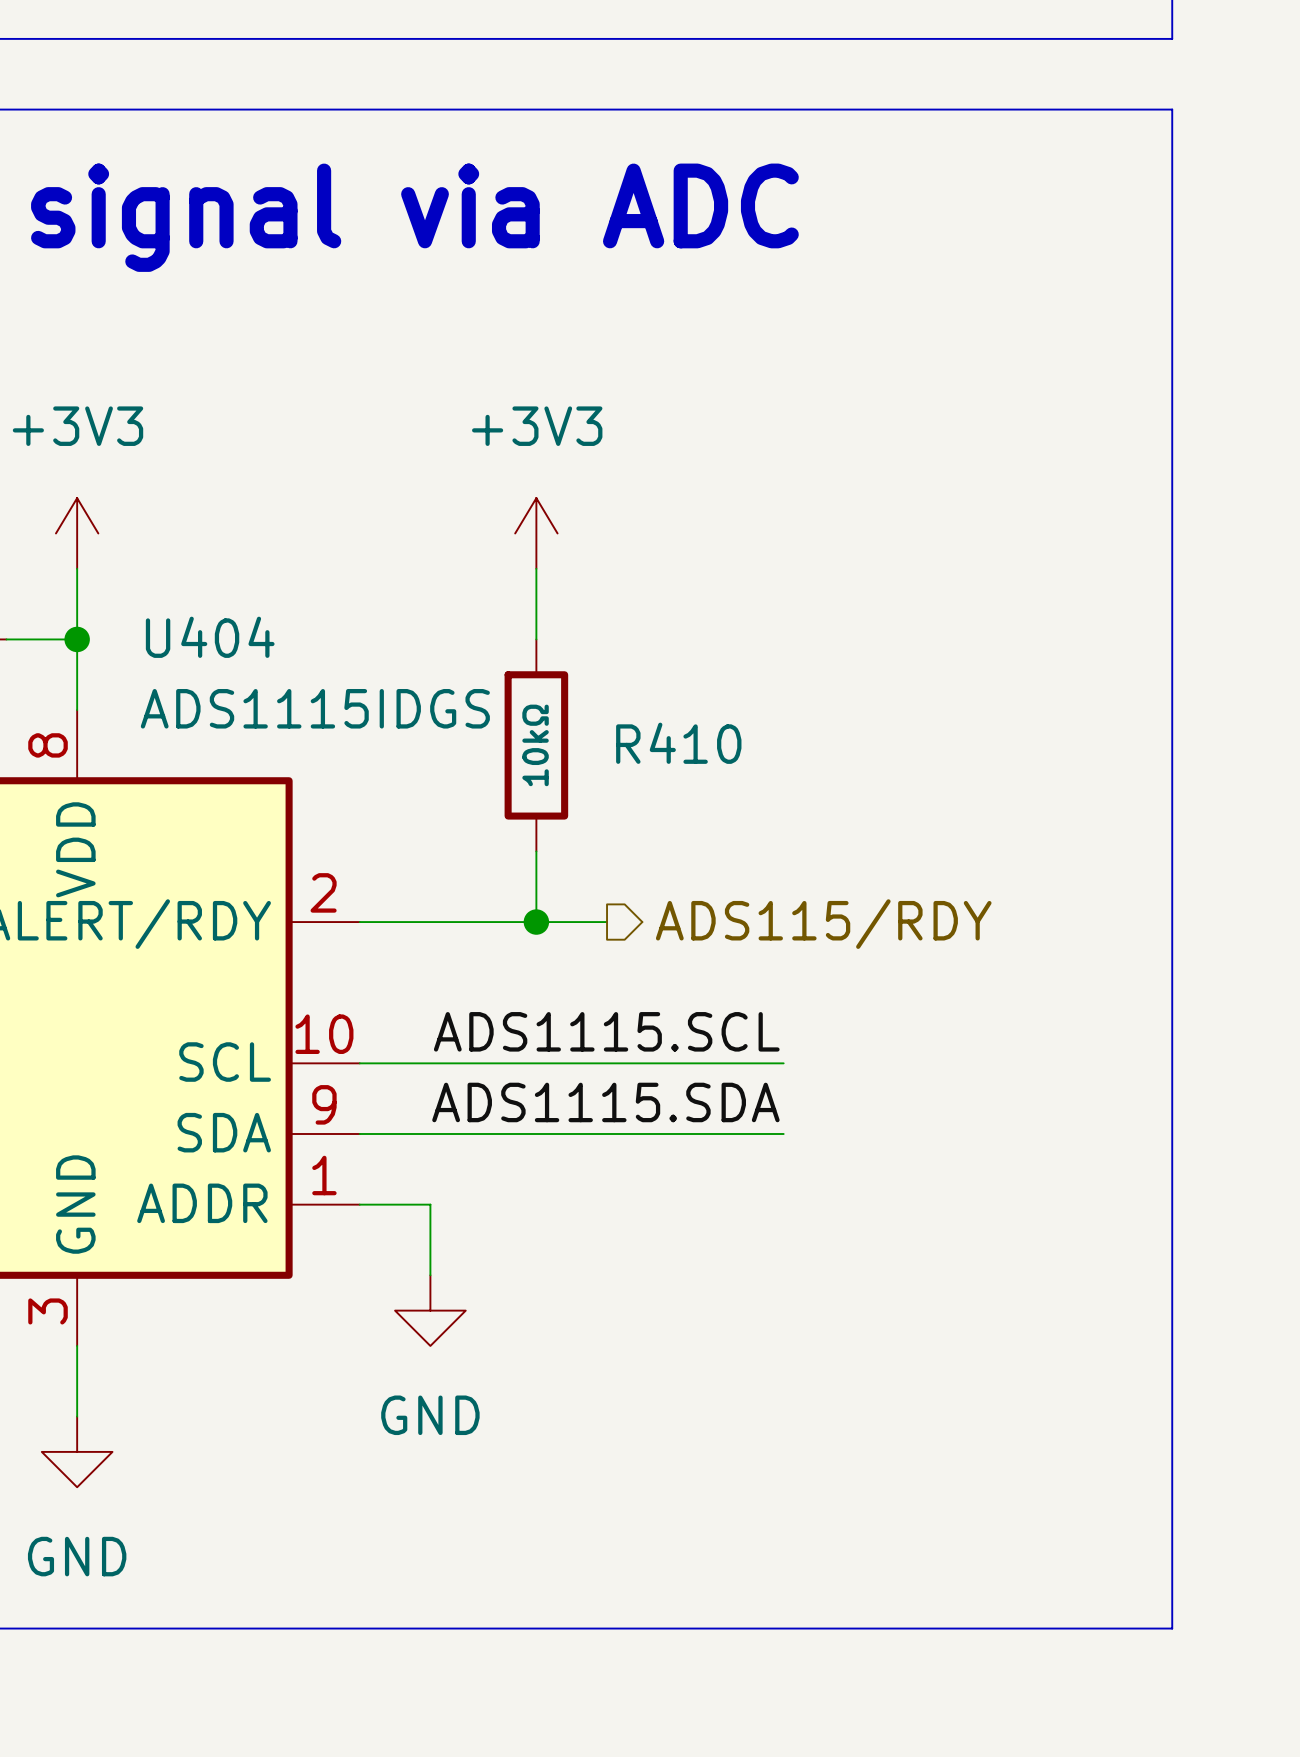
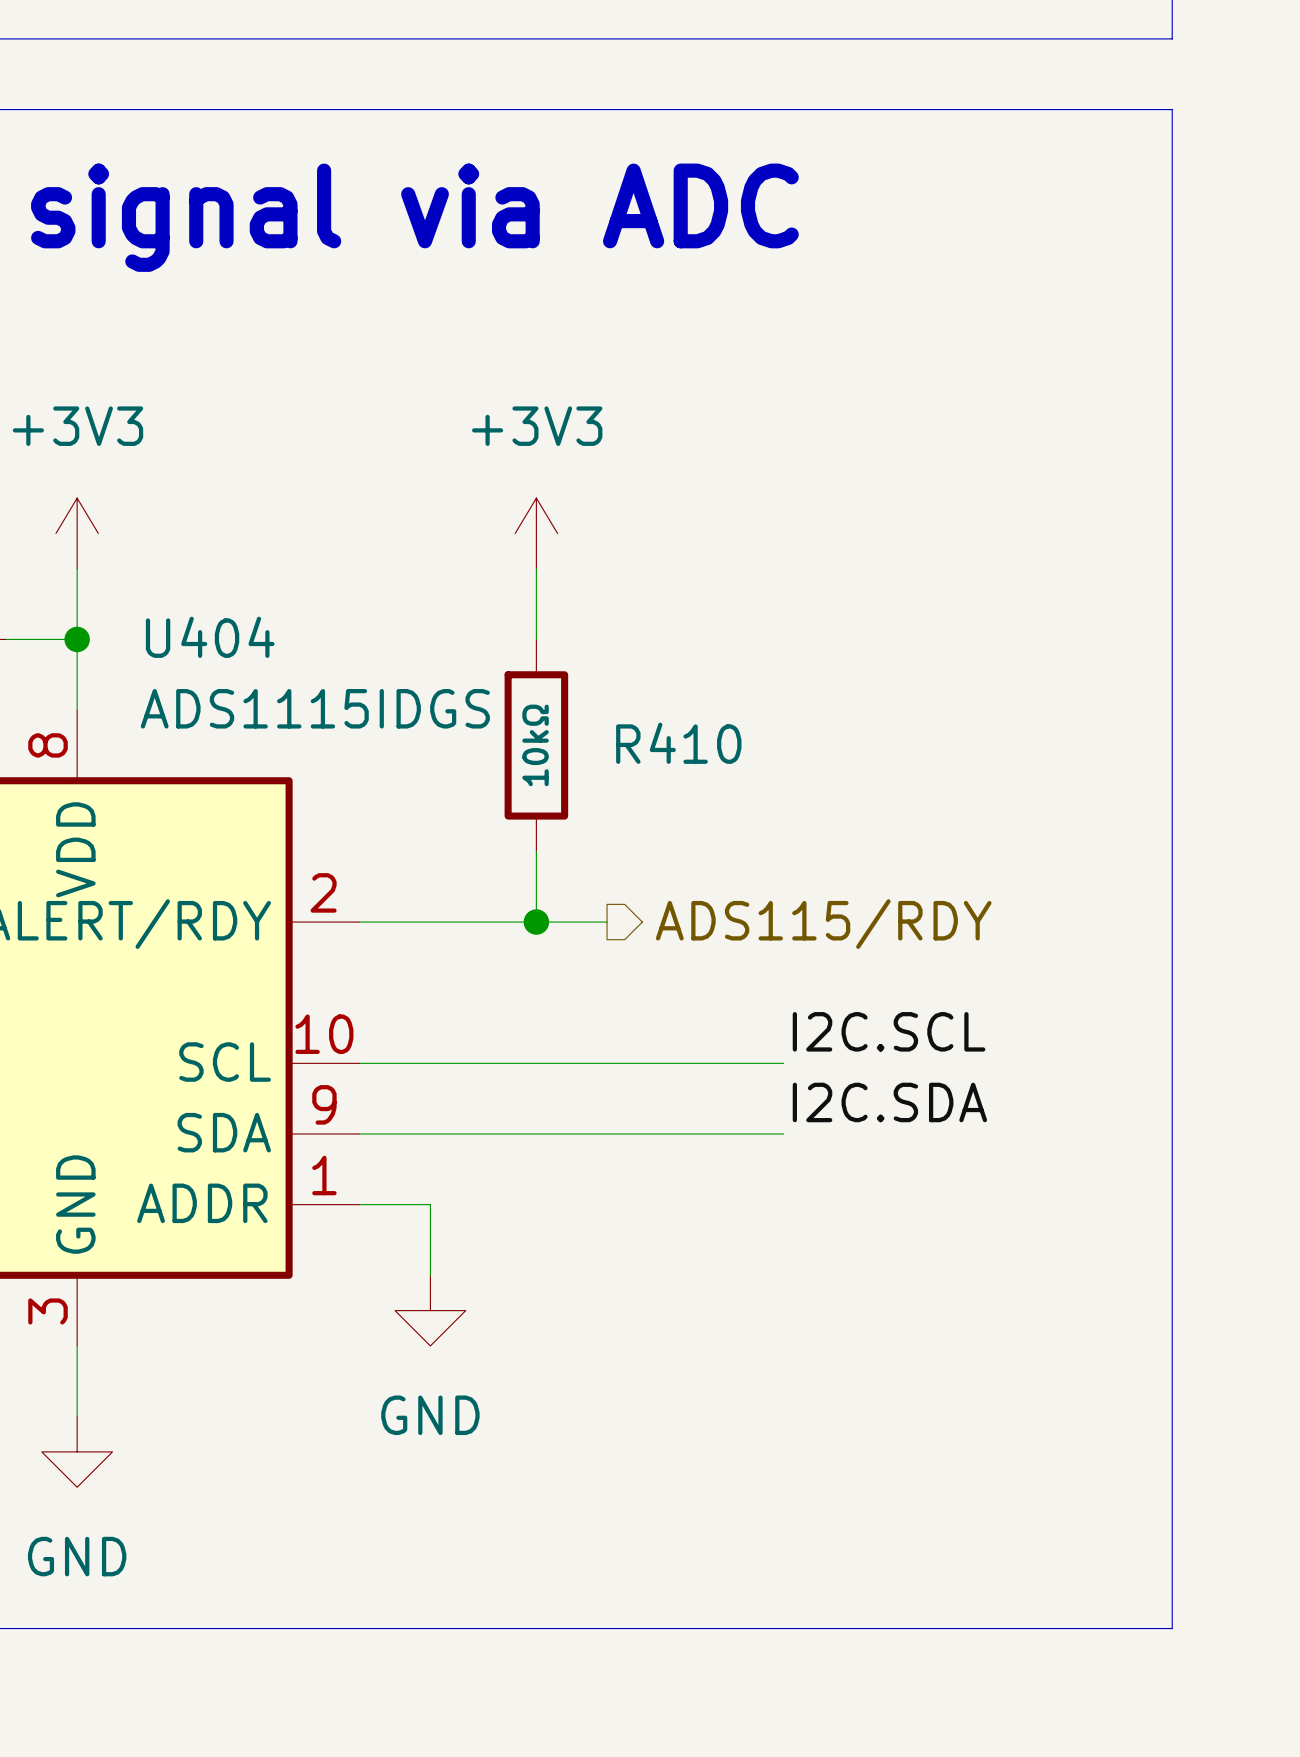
label: ADS1115.SCL (606, 1031) -> I2C.SCL (889, 1031)
label: ADS1115.SDA (605, 1102) -> I2C.SDA (889, 1102)

